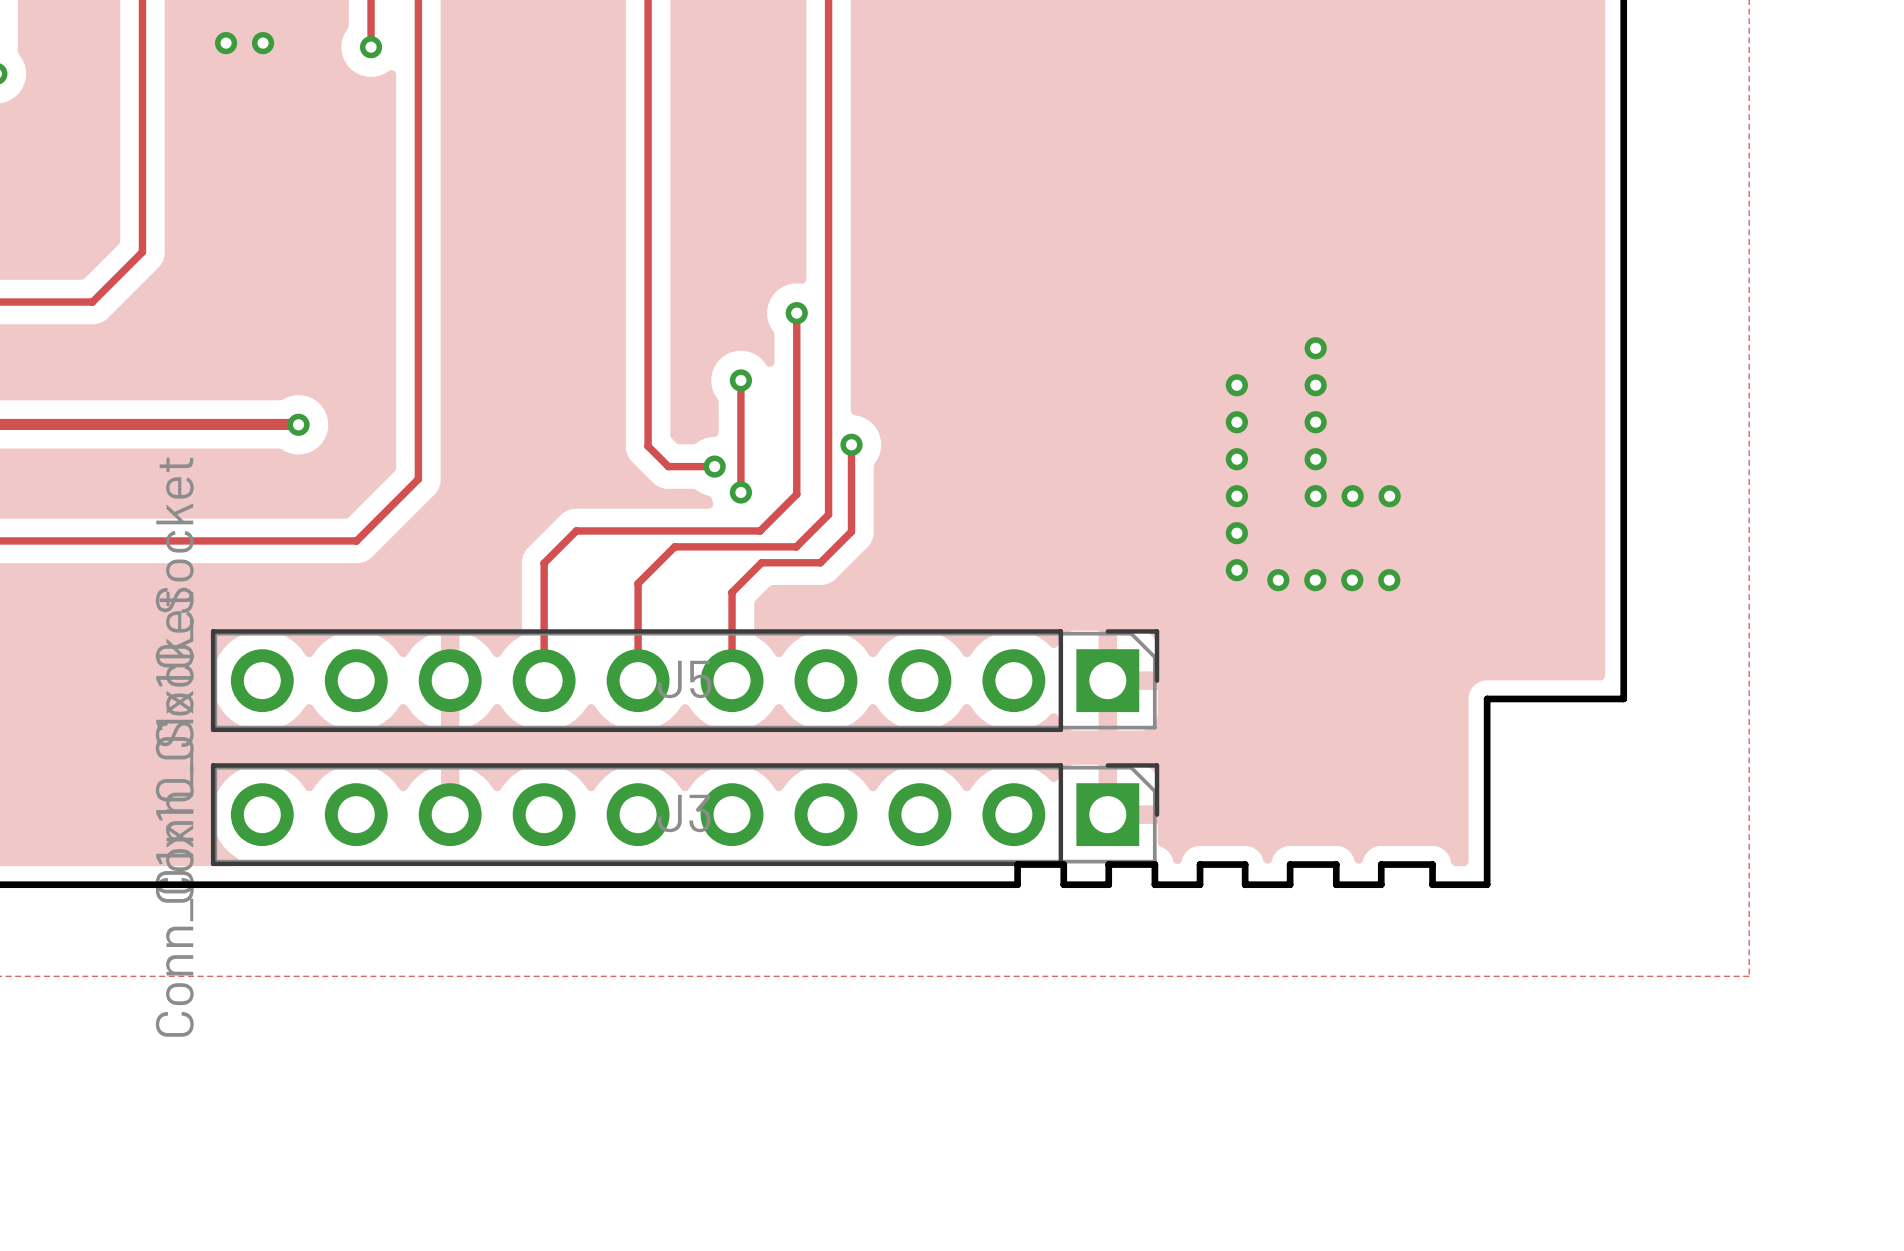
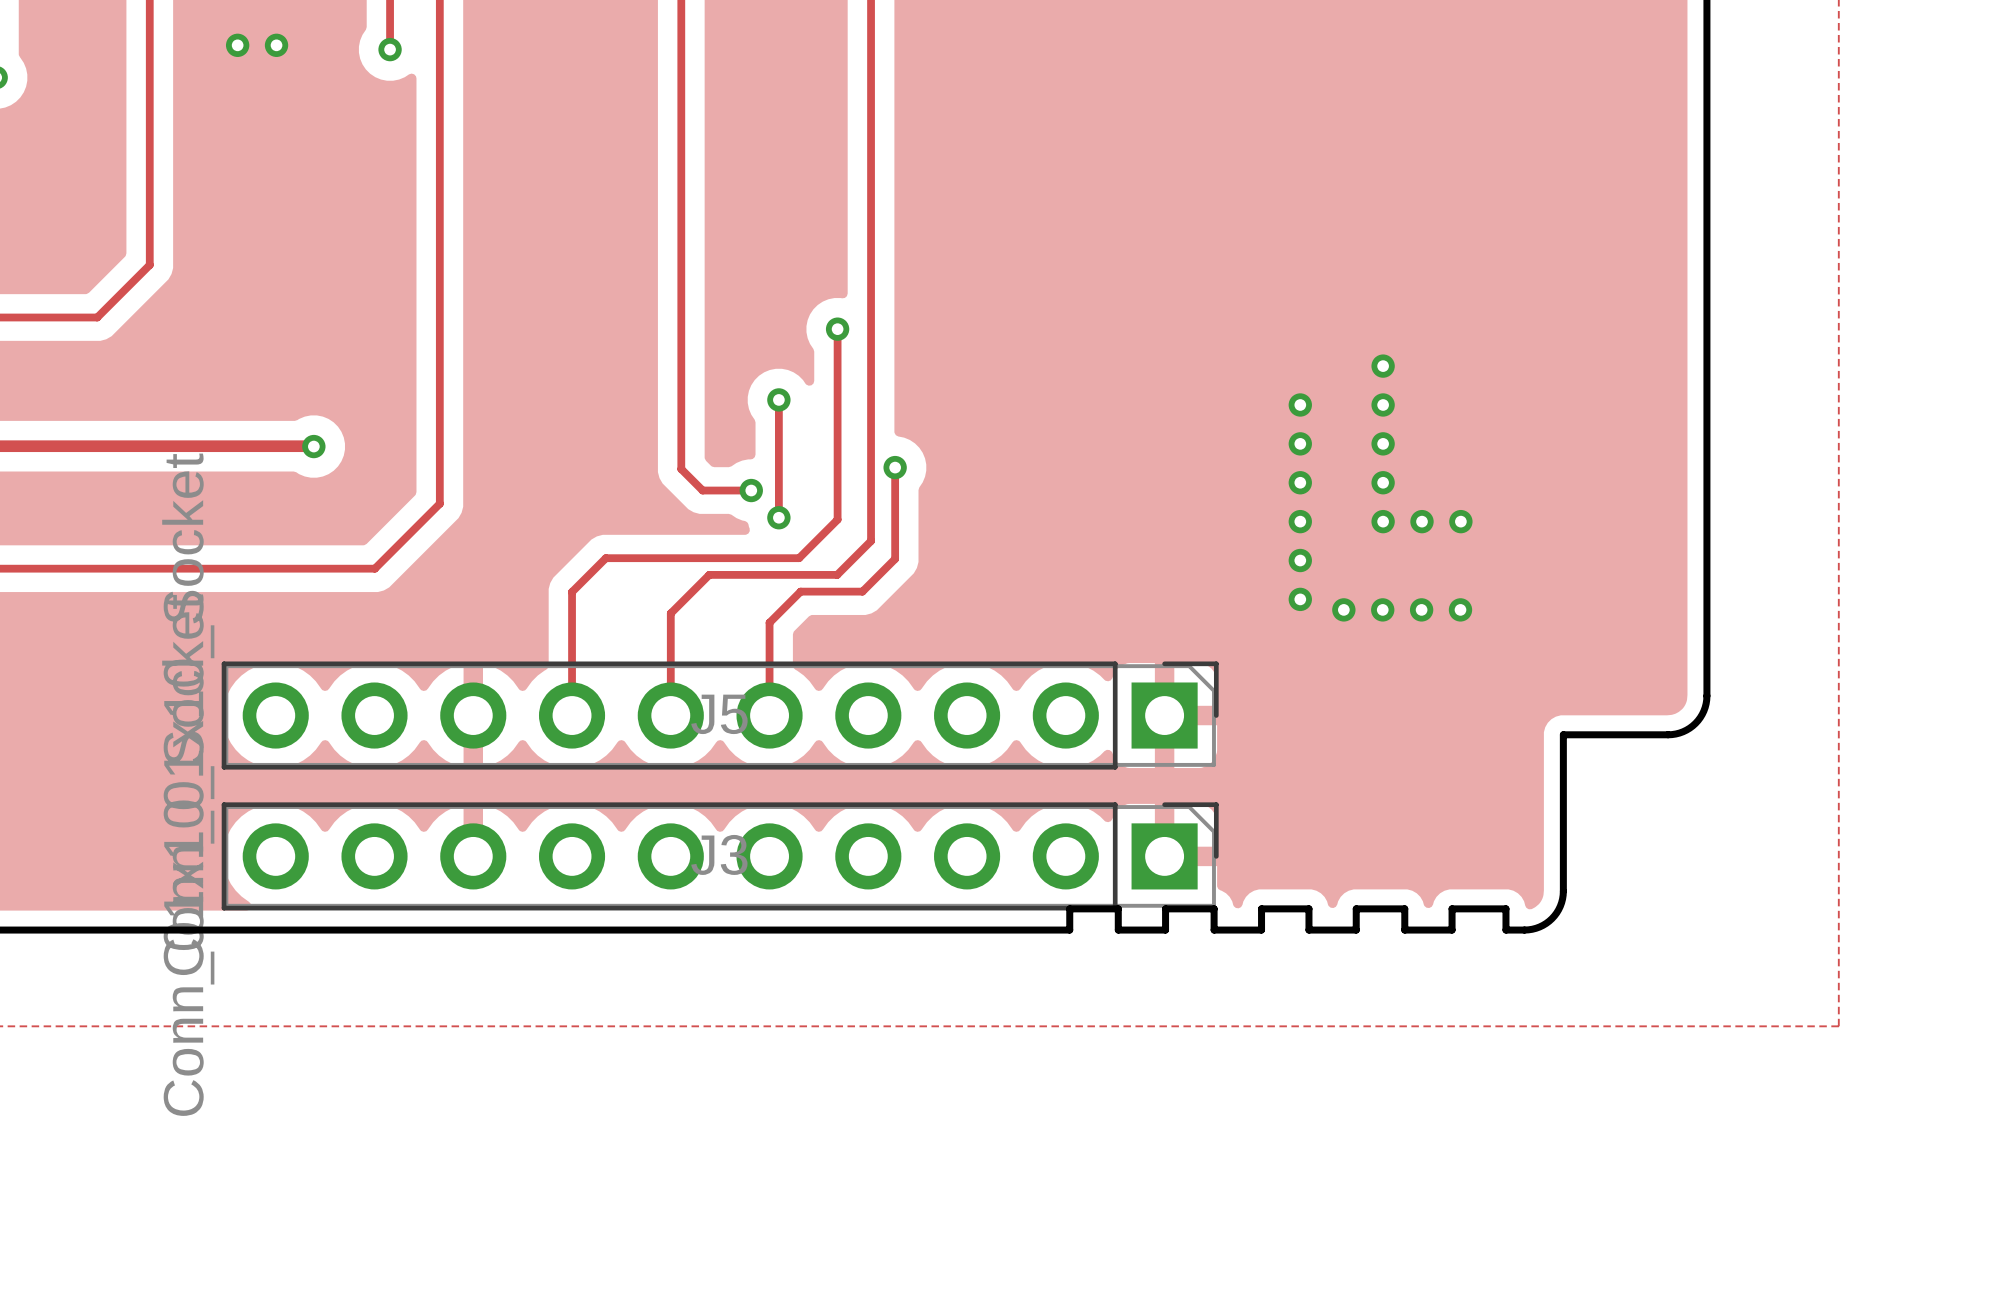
board edge: (1623, 661) (1623, 698) (1586, 698) -> (1706, 695) (1703, 711) (1695, 723) (1683, 731) (1668, 734)
board edge: (1487, 847) (1487, 884) (1450, 884) -> (1563, 891) (1560, 906) (1551, 918) (1539, 926) (1524, 930)

